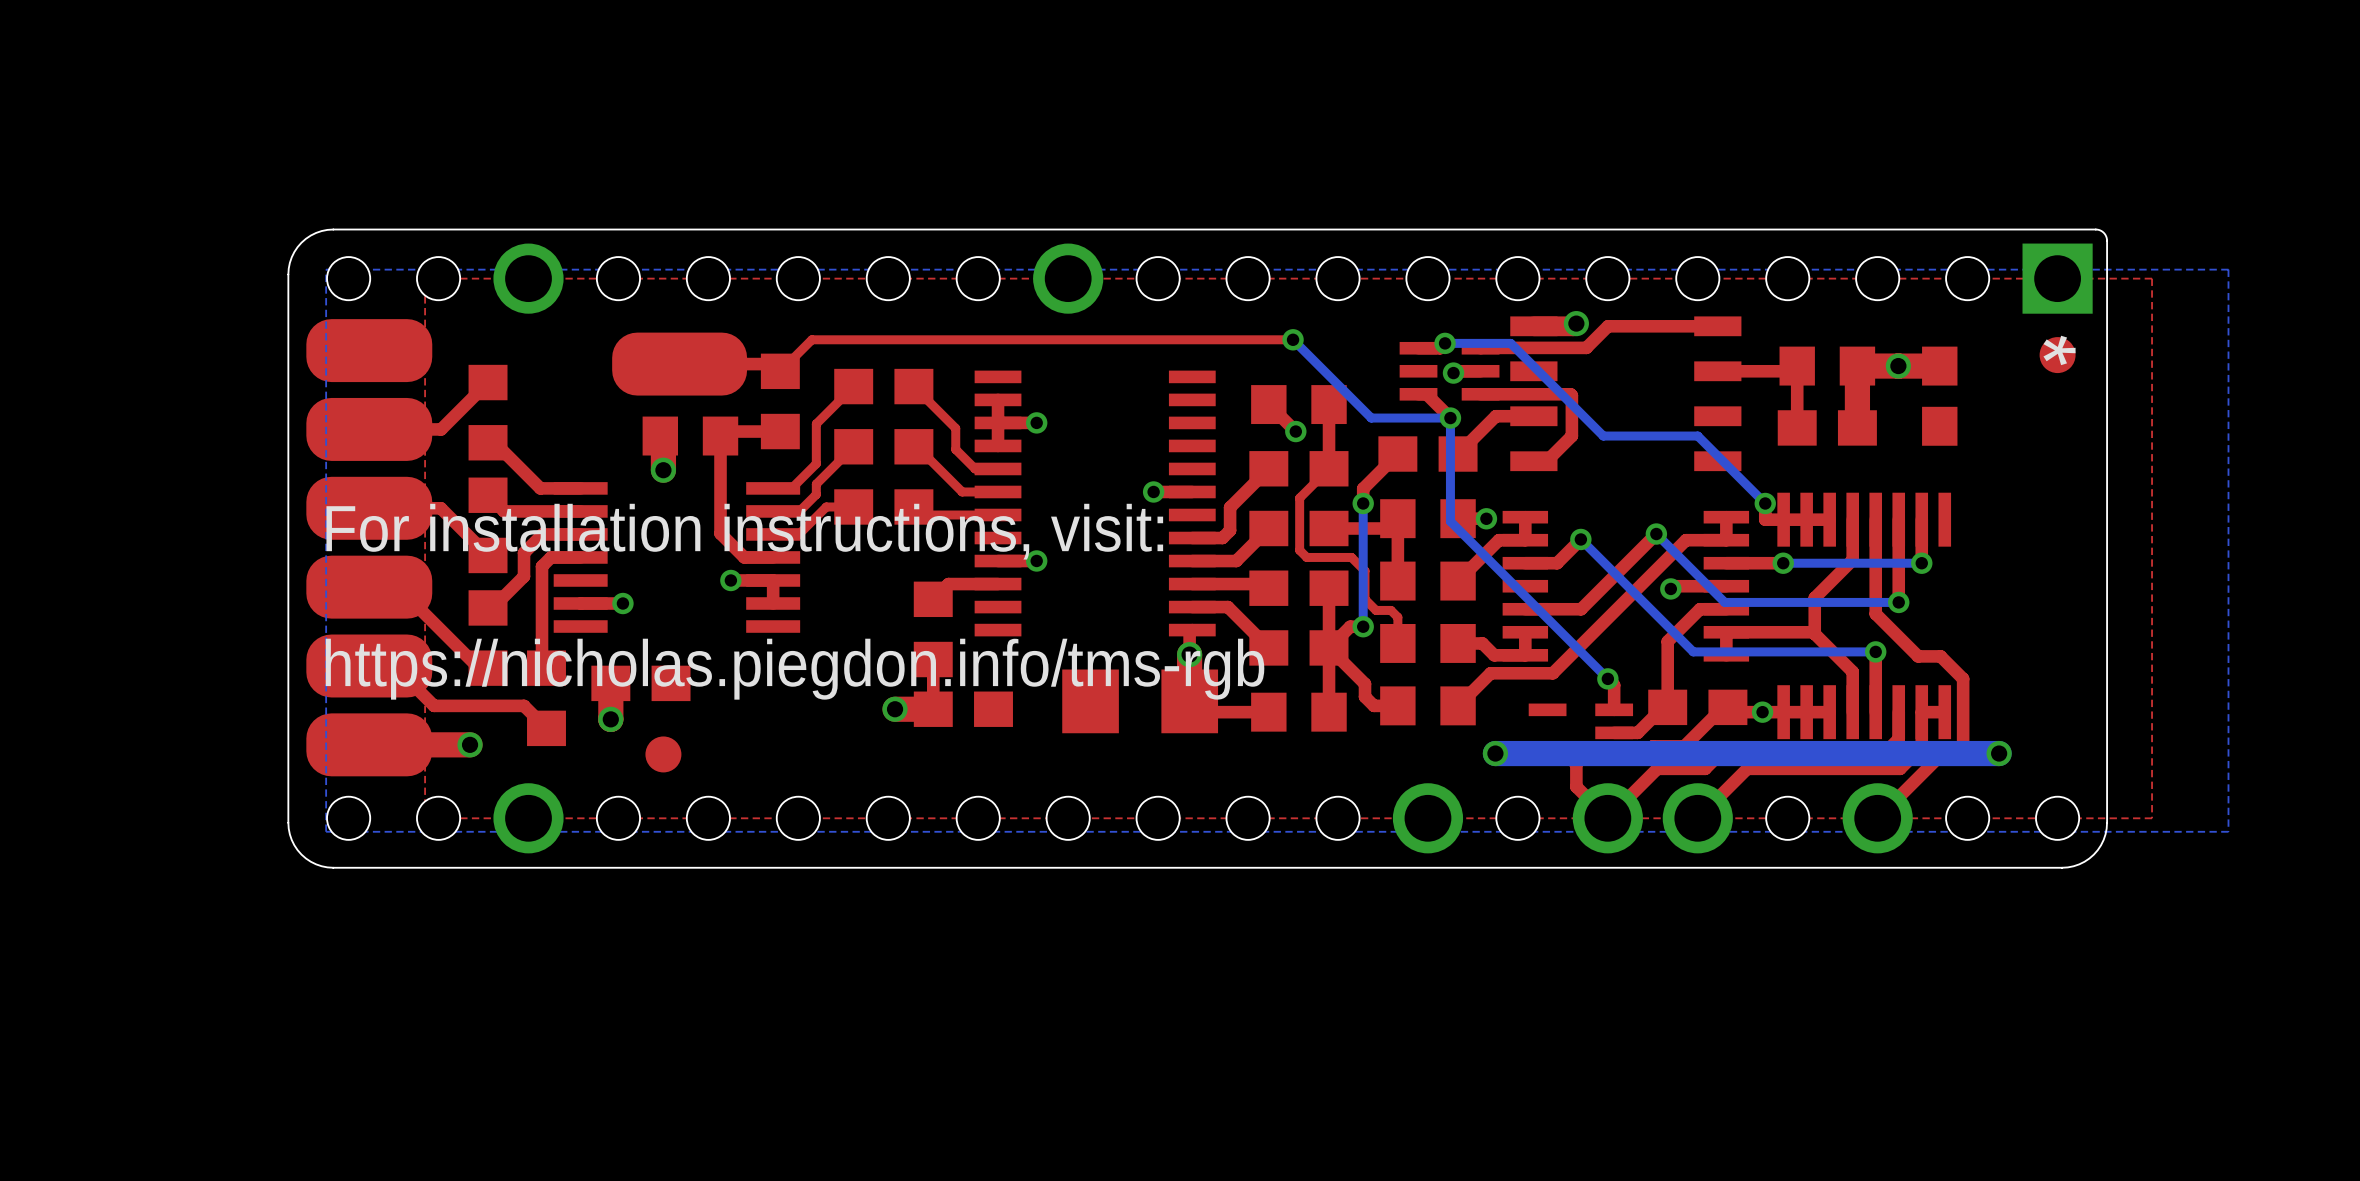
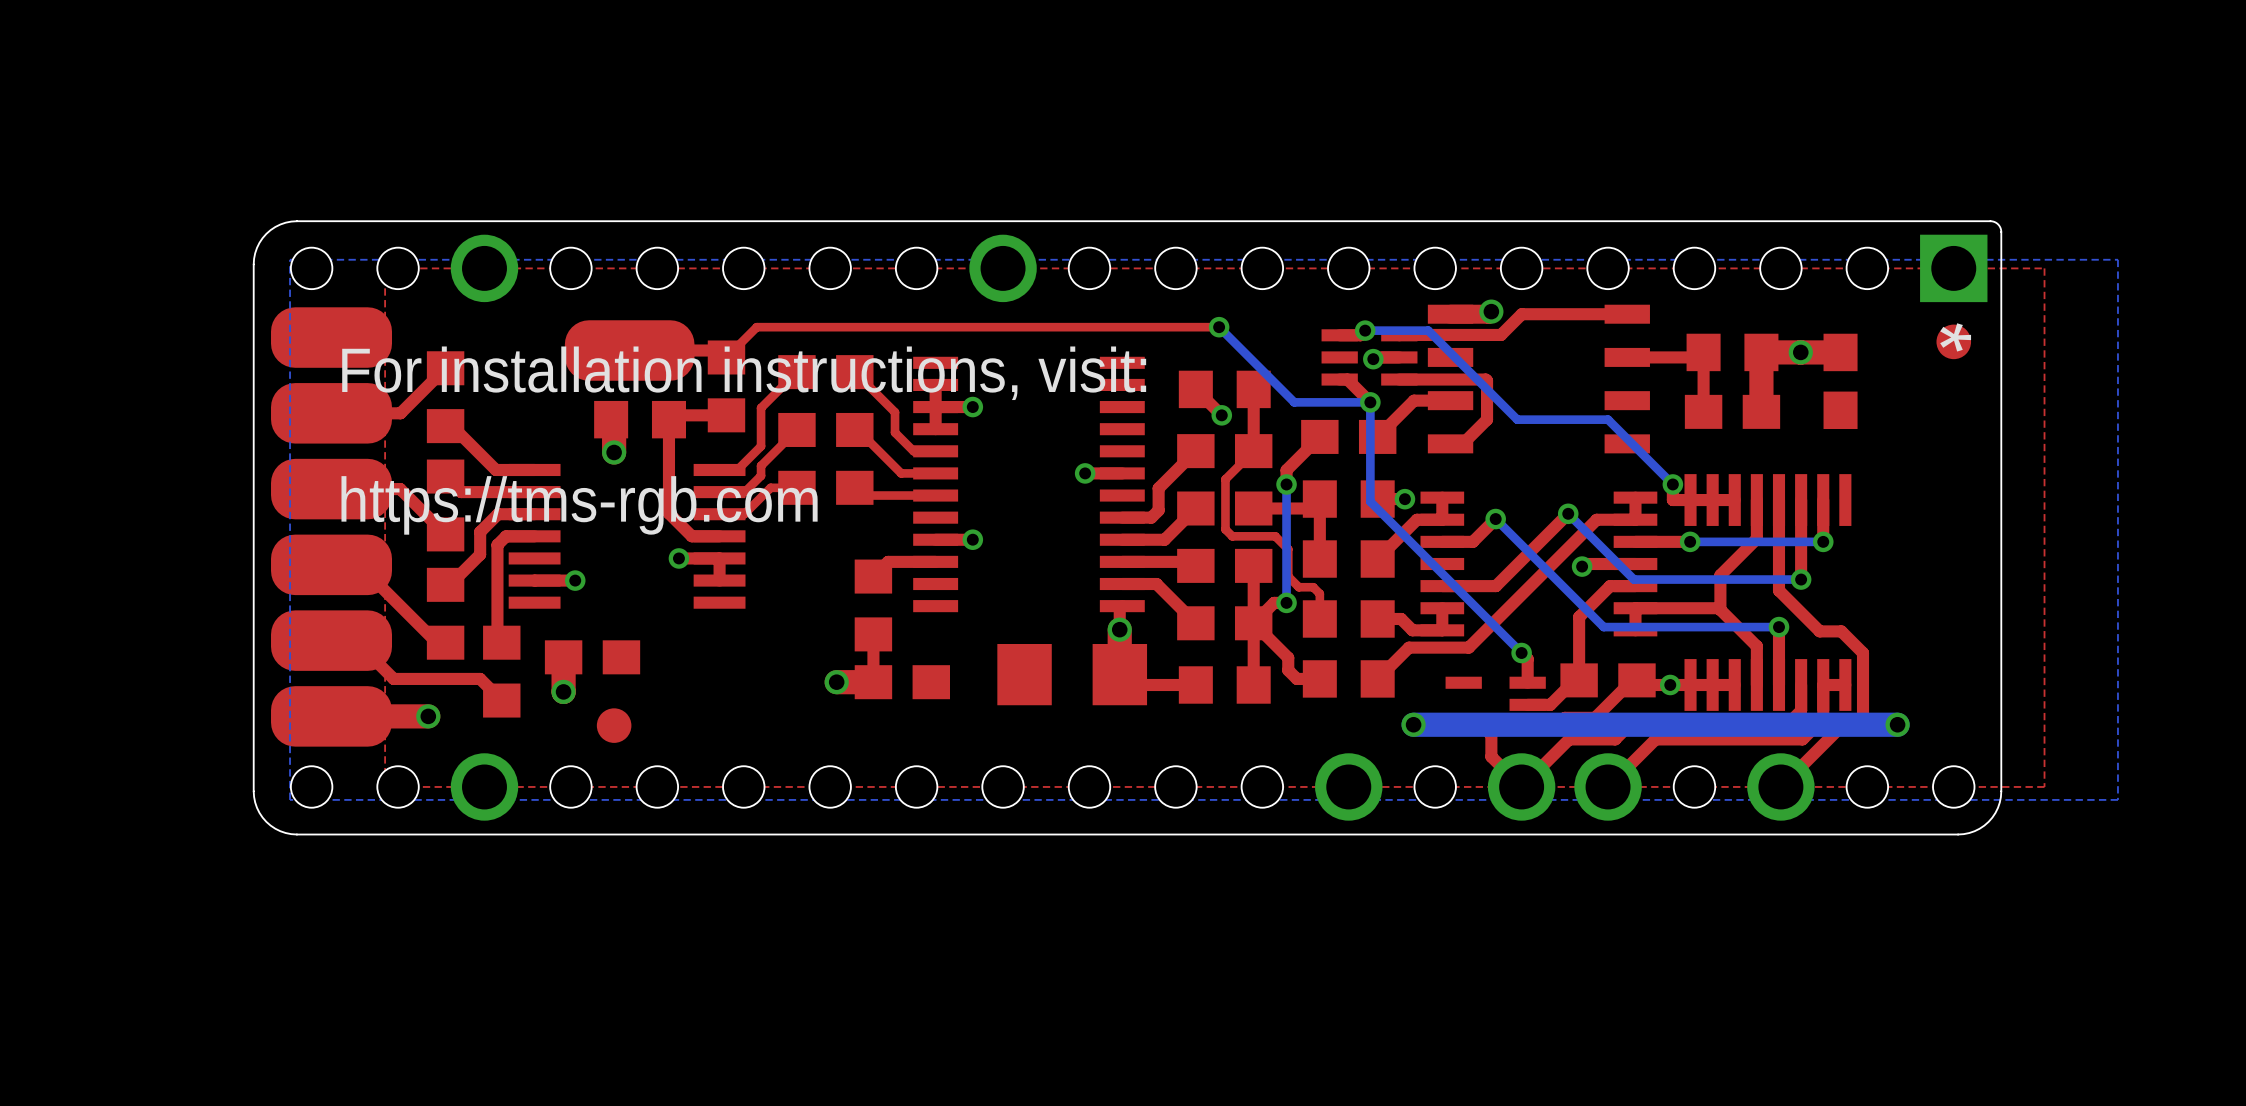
text: none -> https://tms-rgb.com (579, 505)
text position: For installation instructions, visit: (744, 531) -> For installation instructions, visit: (744, 373)
text: https://nicholas.piegdon.info/tms-rgb (795, 669) -> none

